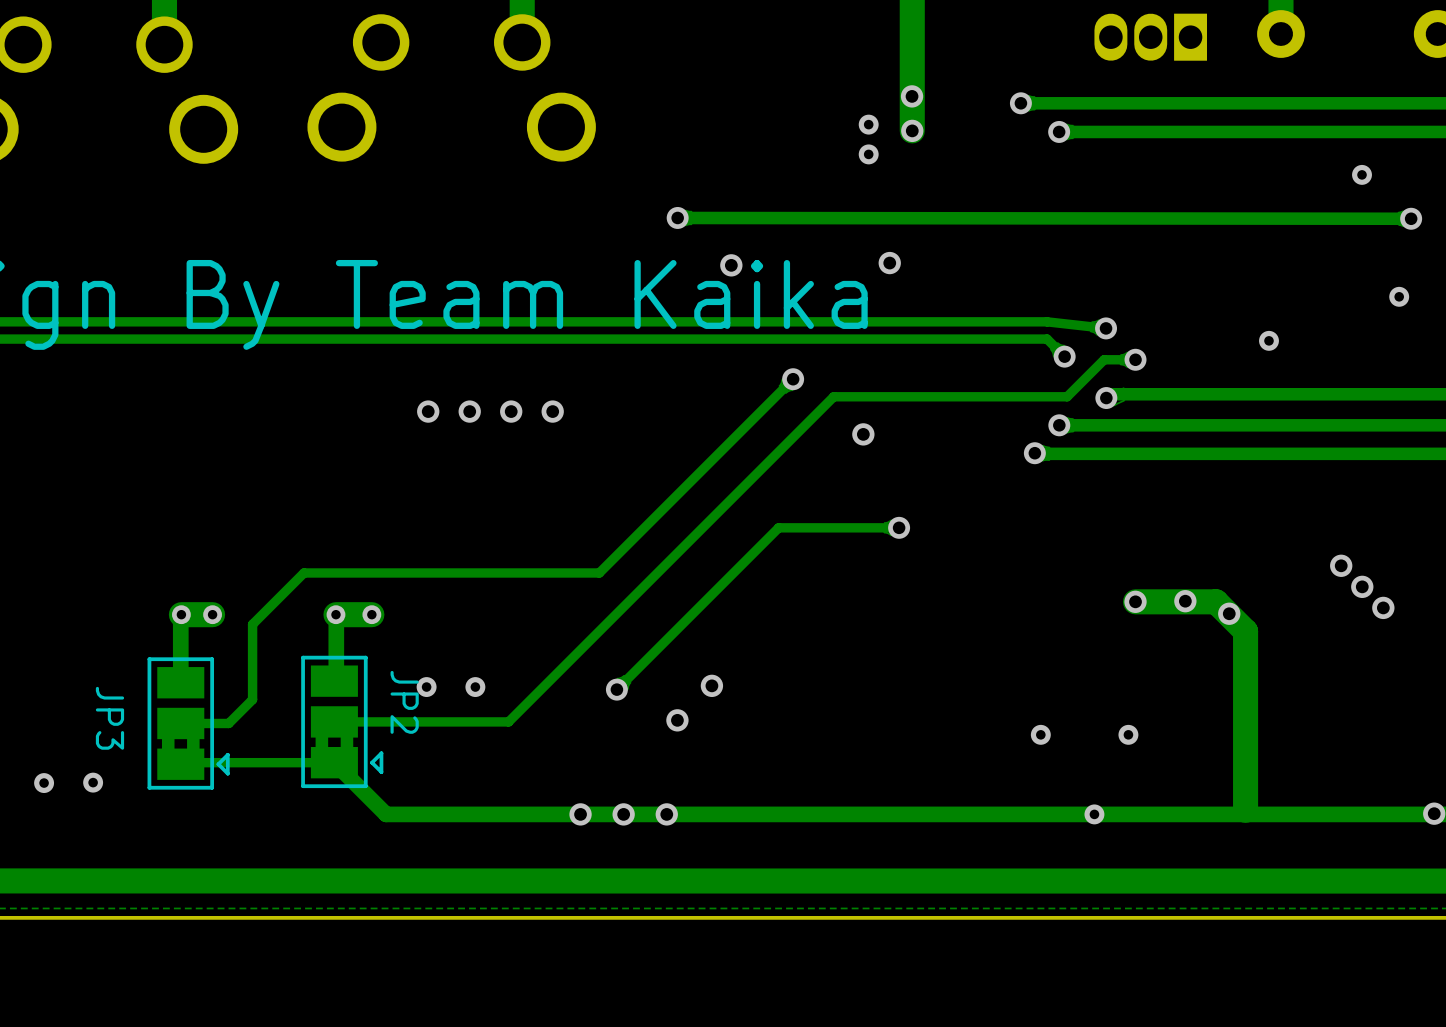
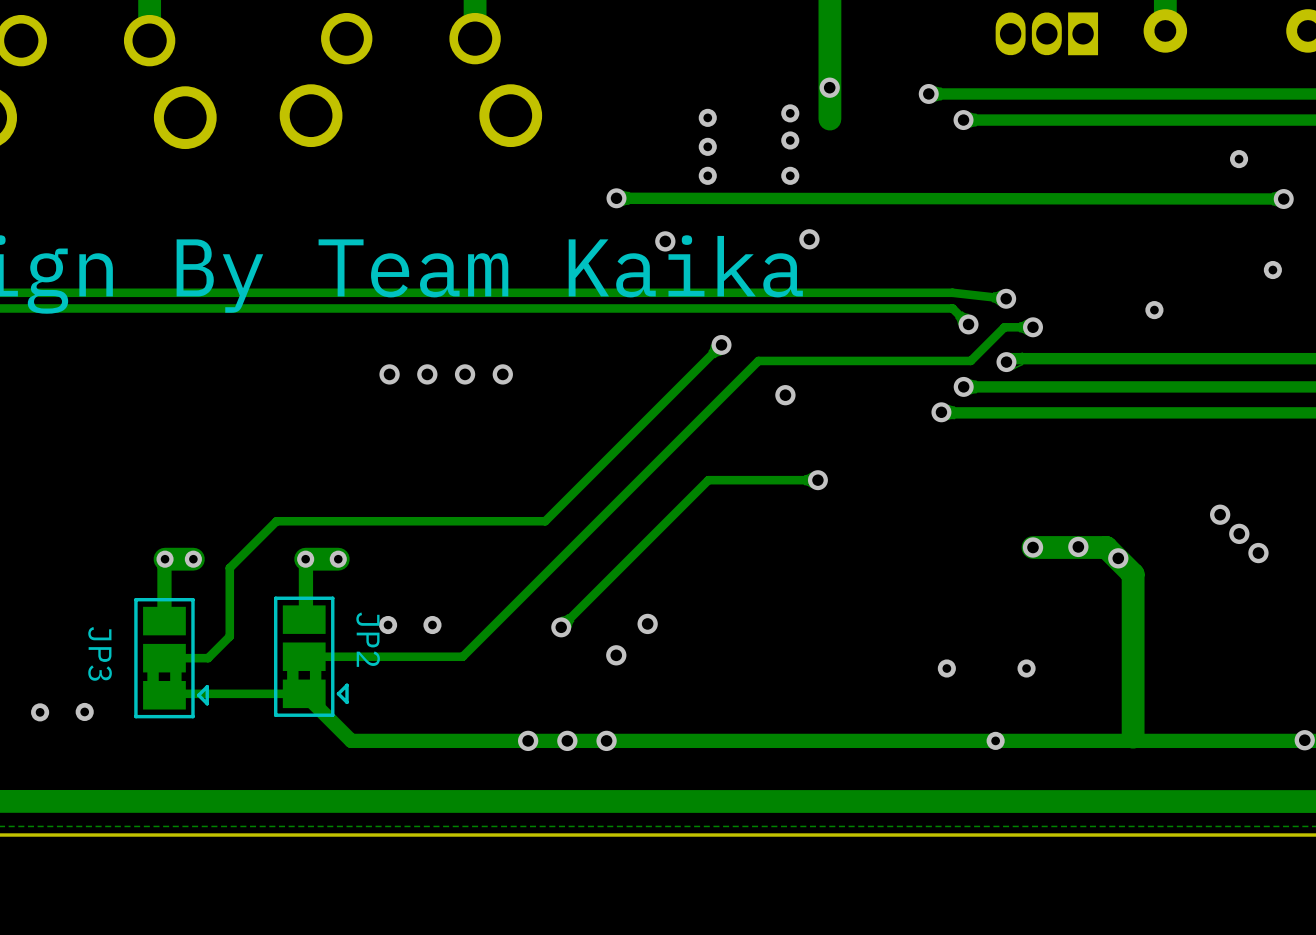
via: none -> (707, 117)
via: (912, 130) -> none
via: none -> (707, 146)
via: none -> (707, 175)
via: none -> (790, 175)

